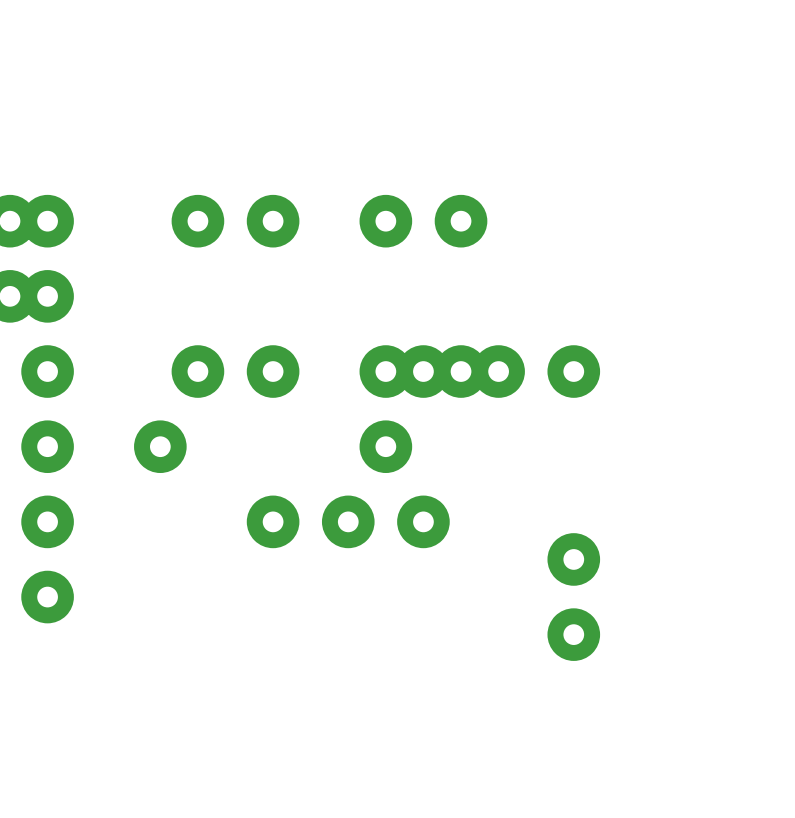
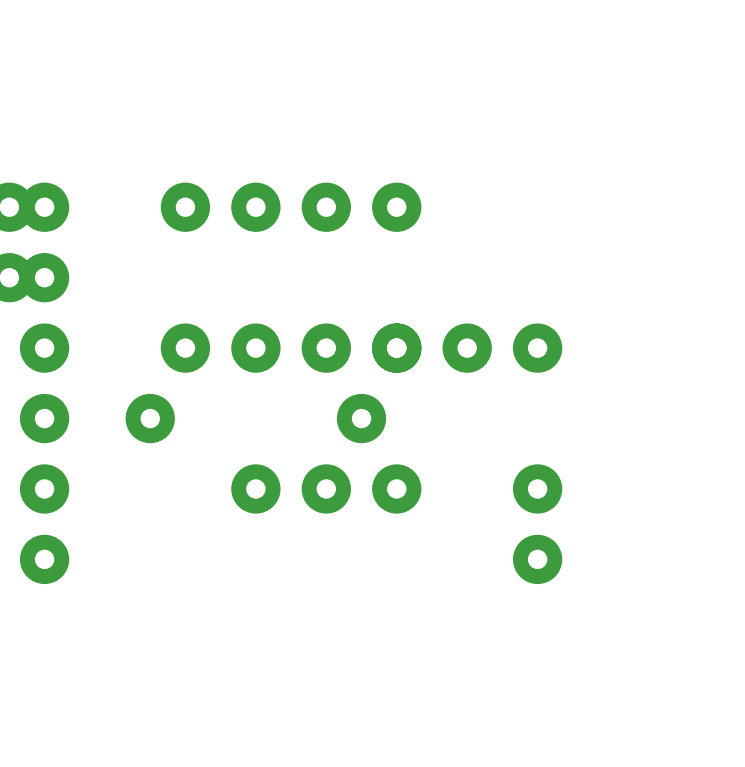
part position: (423, 221) -> (361, 207)
part position: (423, 371) -> (361, 348)
part position: (573, 597) -> (537, 524)

